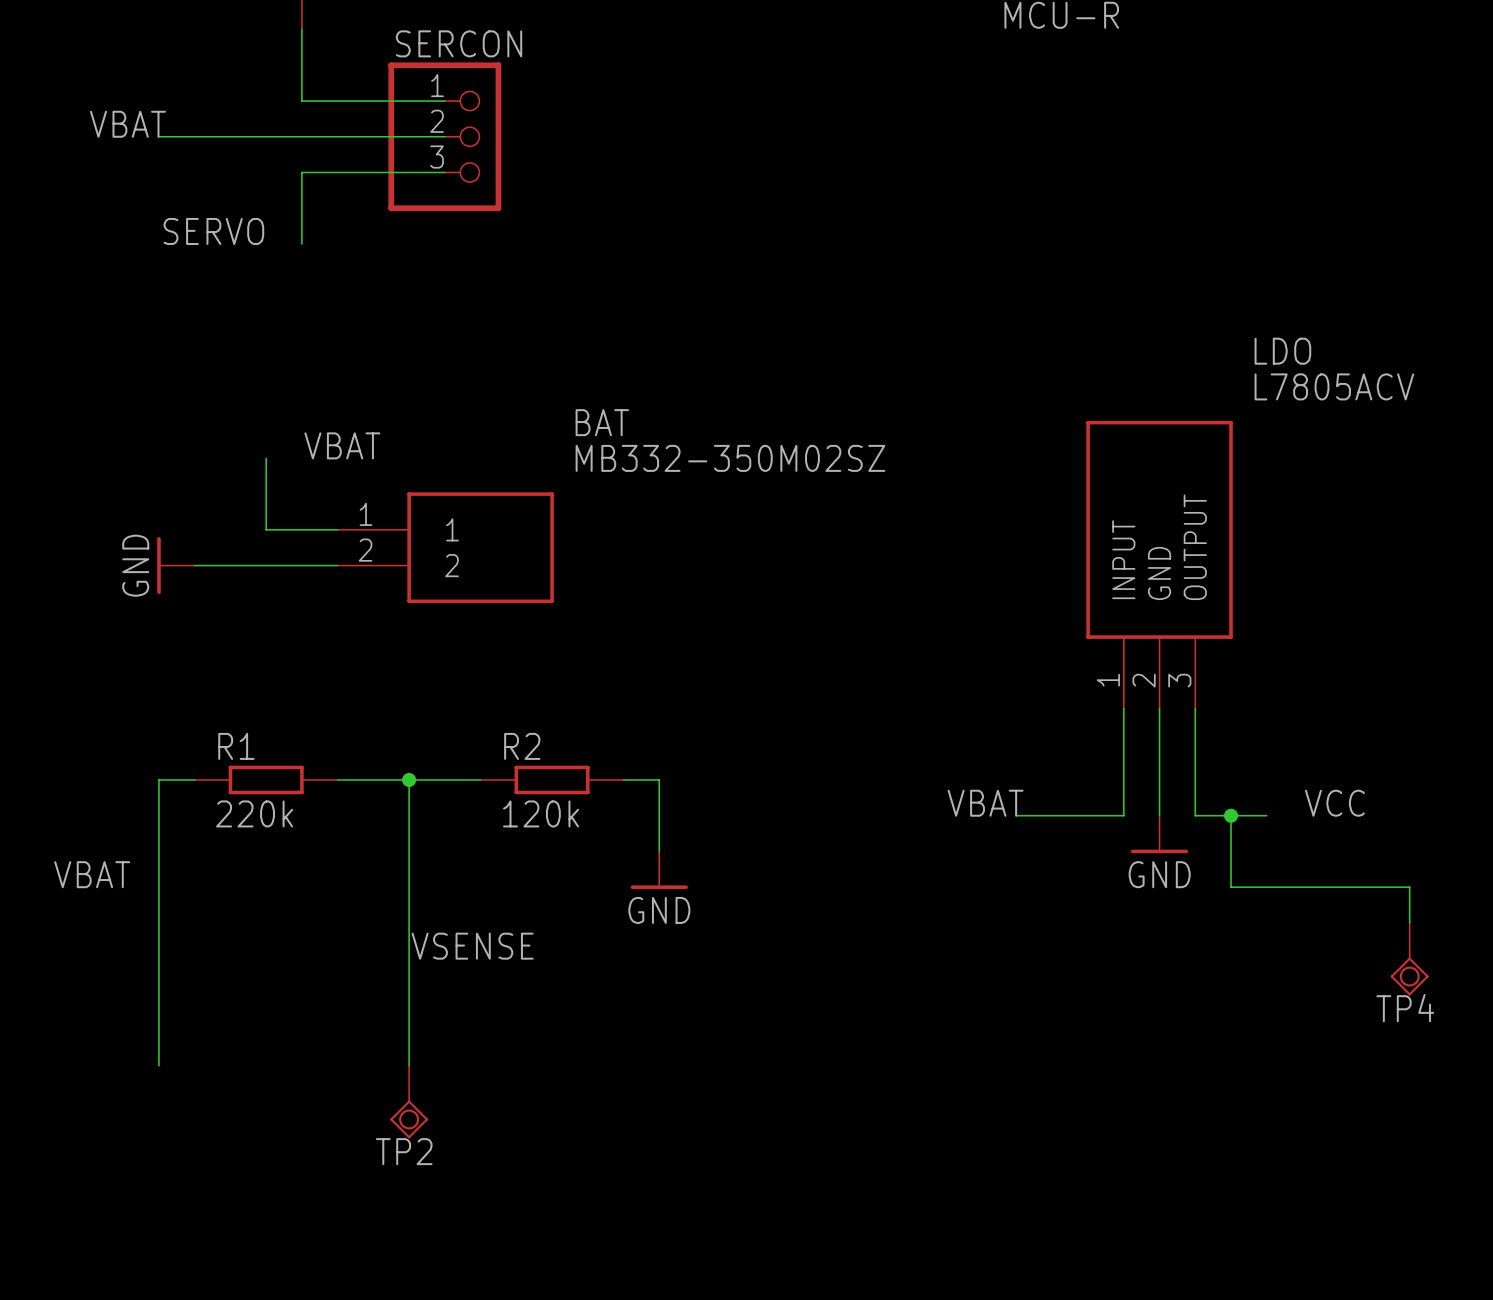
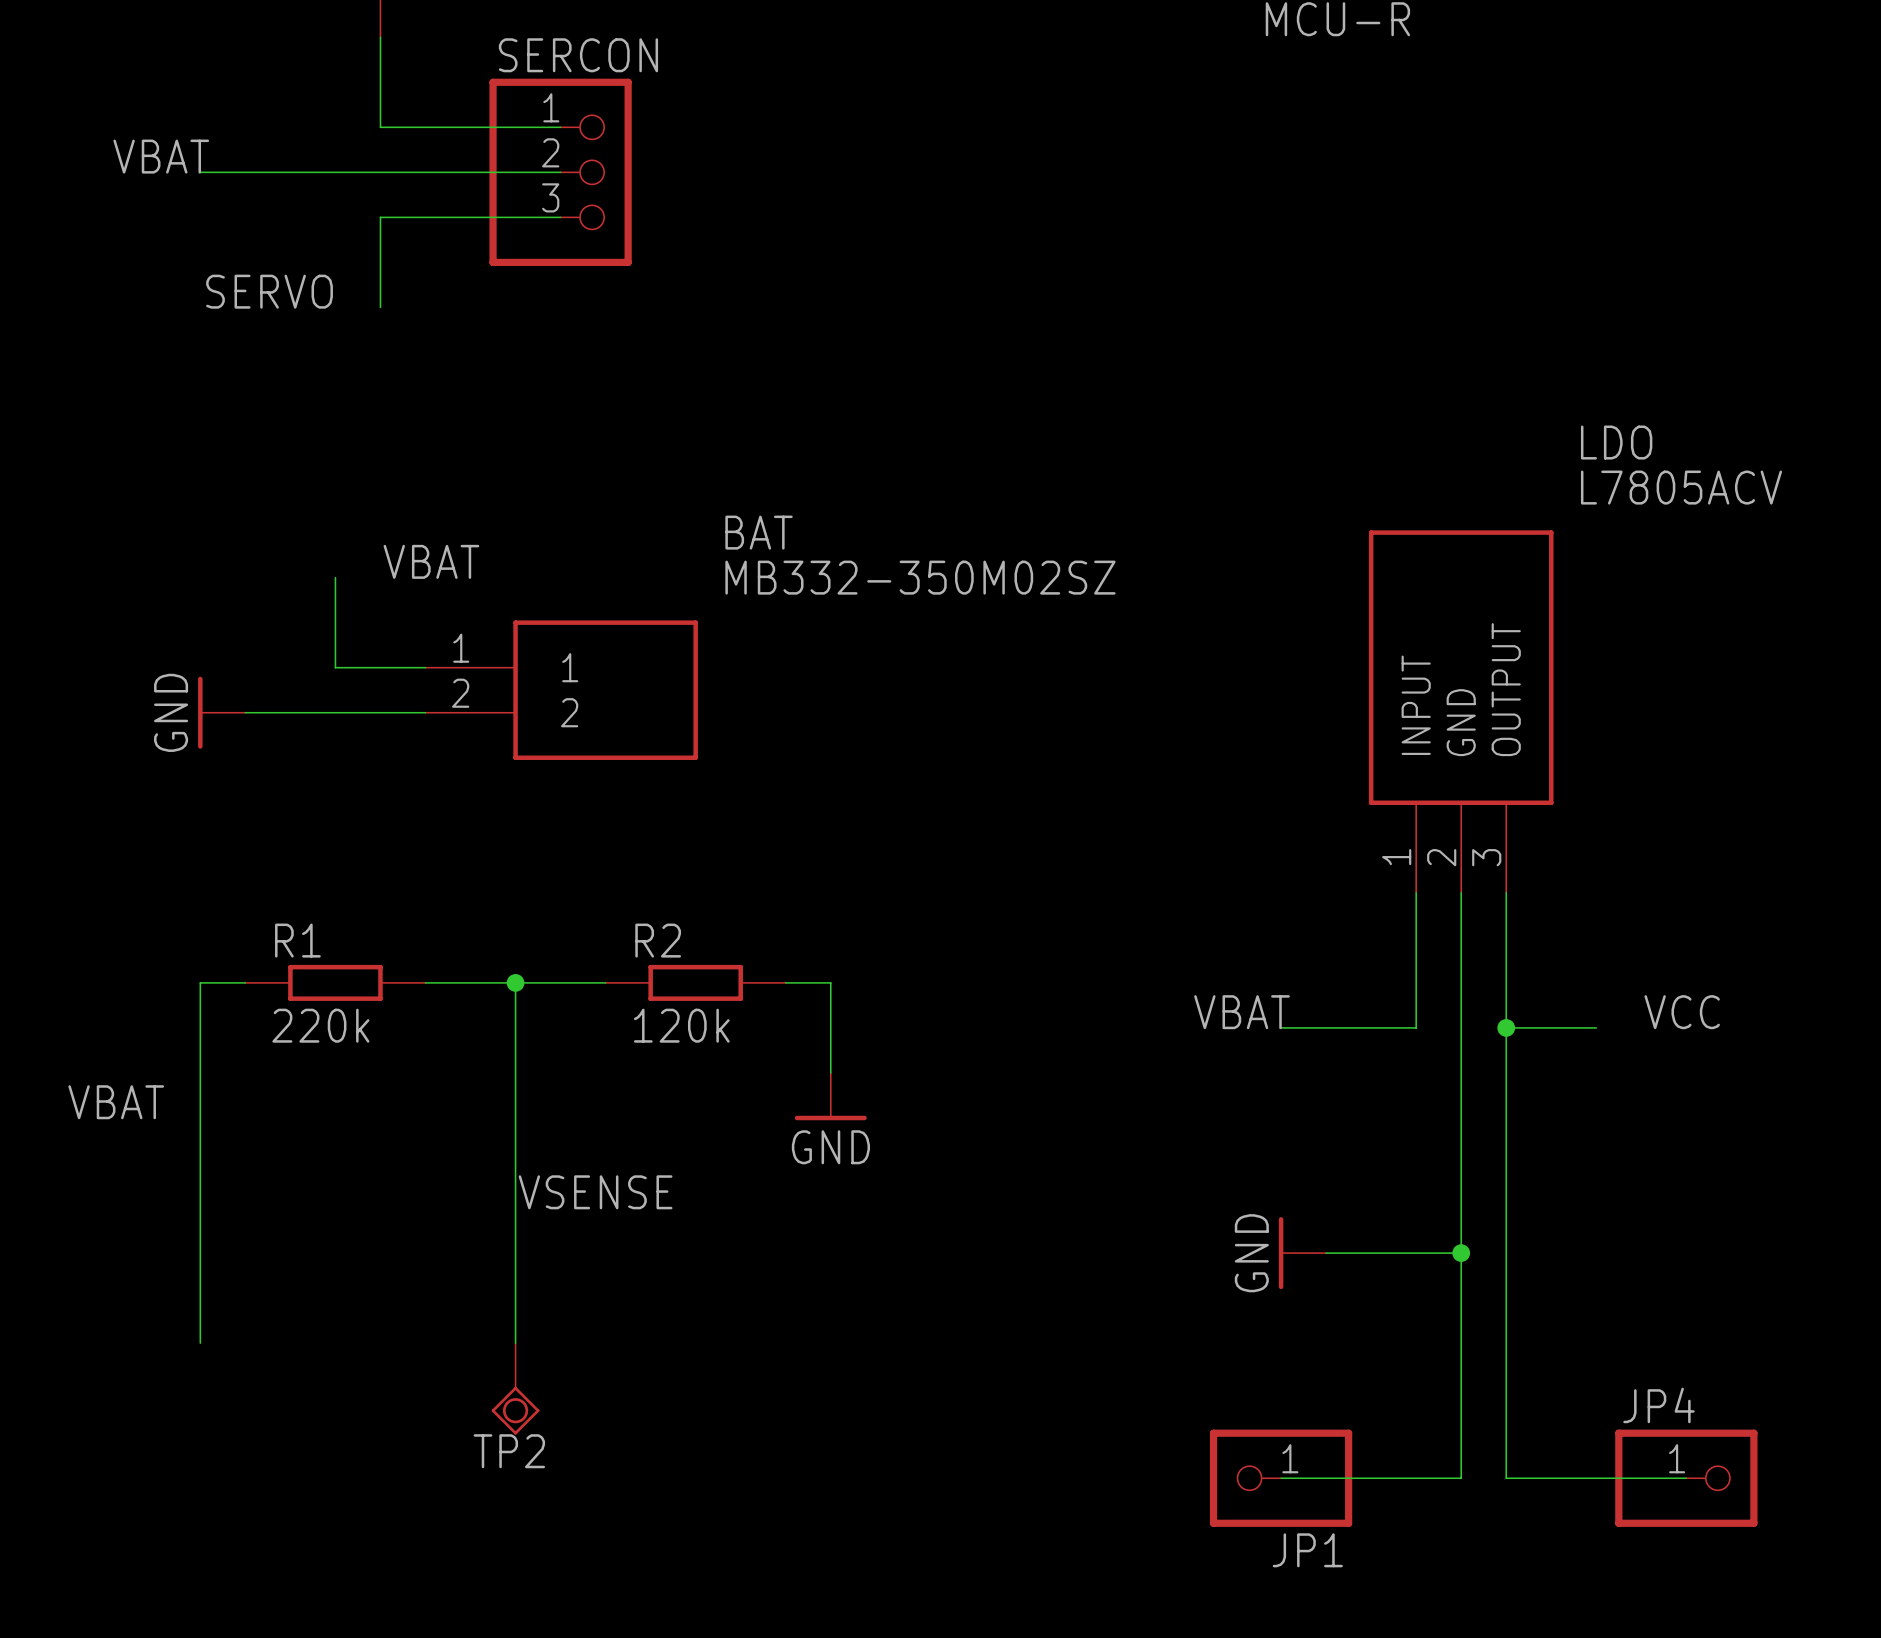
wire: none -> (1461, 1027) (1461, 1478) (1281, 1478)
wire: none -> (1506, 1027) (1506, 1478) (1686, 1478)
wire: (1231, 815) (1231, 887) (1409, 887) (1409, 922) -> none
junction position: (1231, 815) -> (1506, 1027)
power symbol position: GND (1159, 834) -> GND (1302, 1253)
power symbol rotation: 0° (1159, 851) -> 90° clockwise (1281, 1253)
TP4: (1409, 959) -> none
wire: none -> (1326, 1253) (1461, 1253)
junction: none -> (1461, 1253)
JP1: none -> (1281, 1478)
JP4: none -> (1686, 1478)

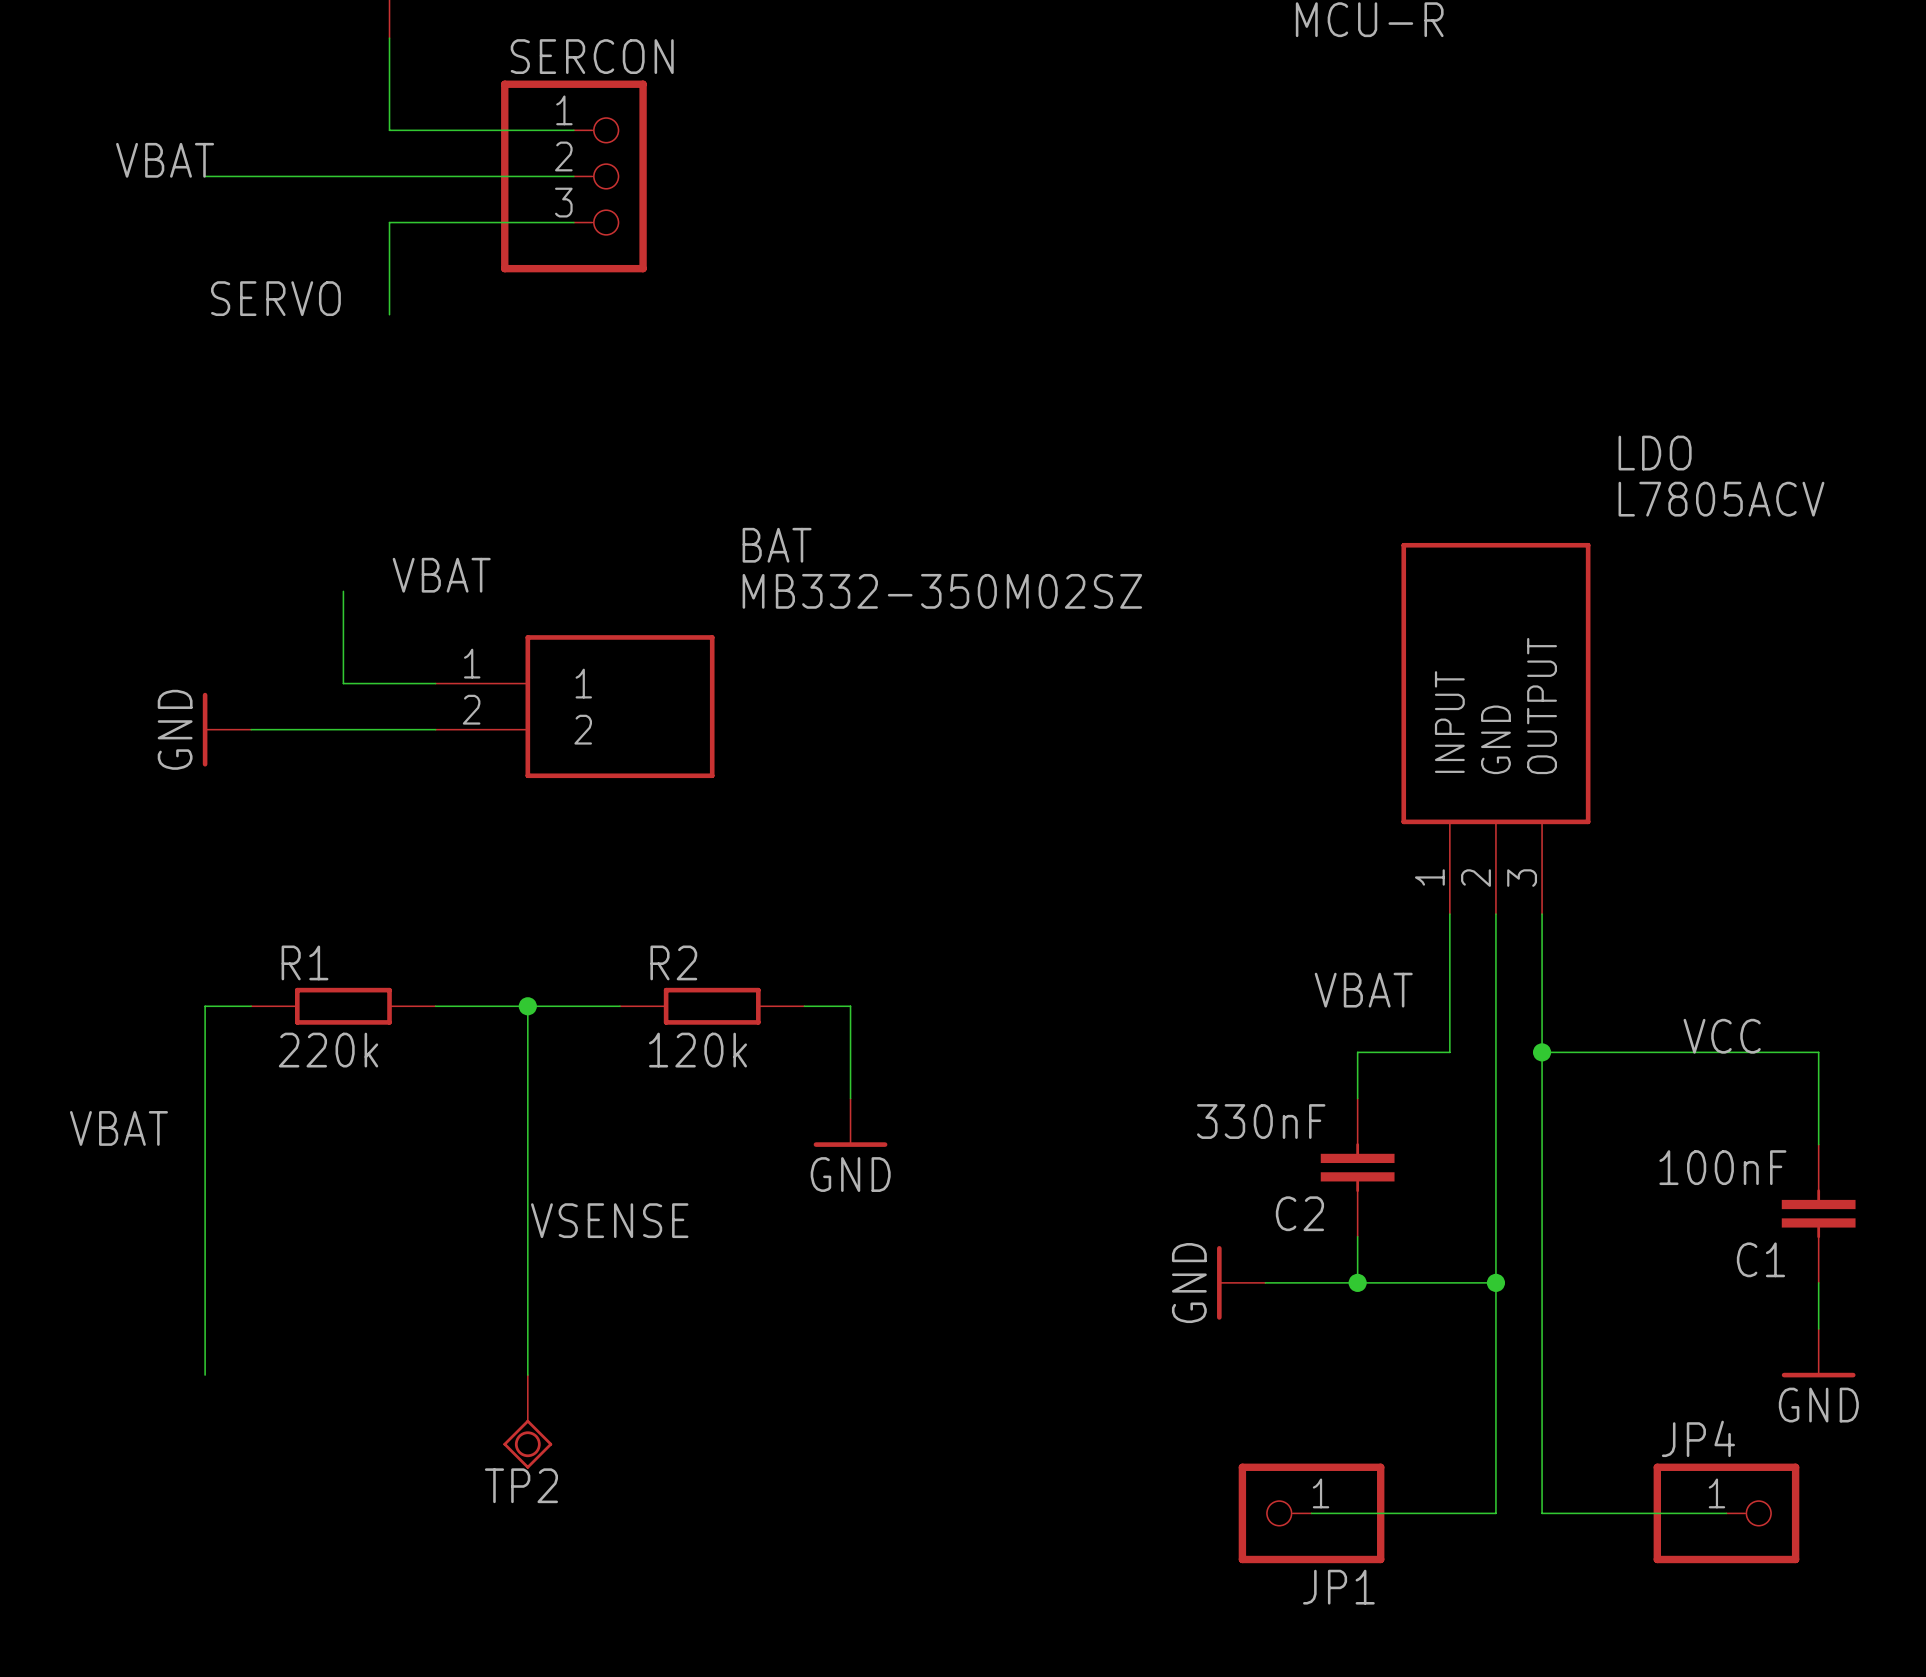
label position: VBAT (1241, 1012) -> VBAT (1363, 990)
wire: (1281, 1027) (1326, 1027) -> (1357, 1098) (1357, 1052)
wire: none -> (1634, 1052) (1818, 1052) (1818, 1144)
C2: none -> 330nF (1357, 1167)
C1: none -> 100nF (1818, 1213)
wire: none -> (1357, 1236) (1357, 1282) (1265, 1282)
power symbol position: GND (1302, 1253) -> GND (1241, 1282)
junction: none -> (1357, 1282)
wire: none -> (1818, 1282) (1818, 1328)
power symbol: none -> GND (1818, 1353)

